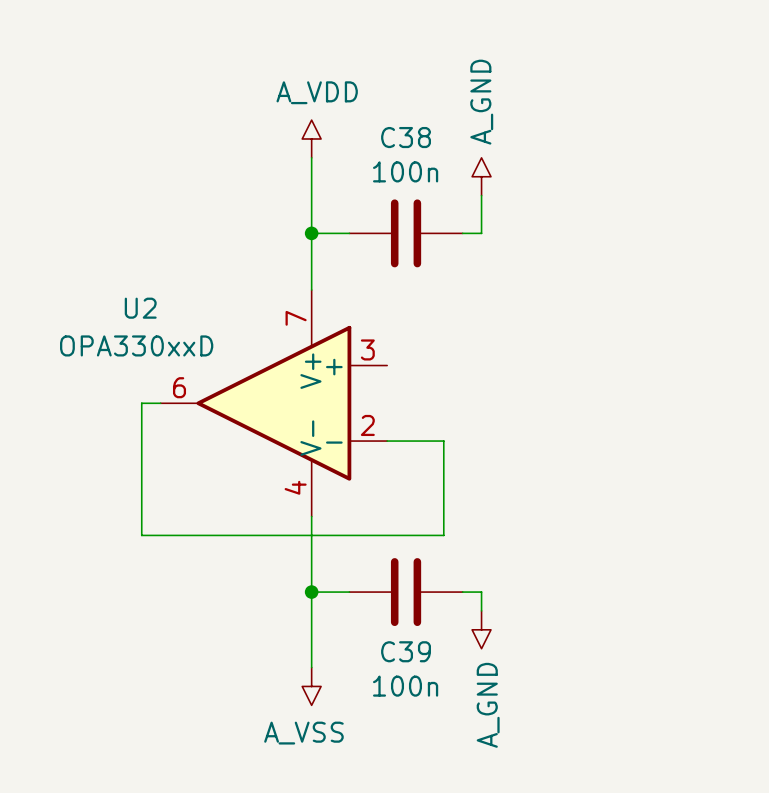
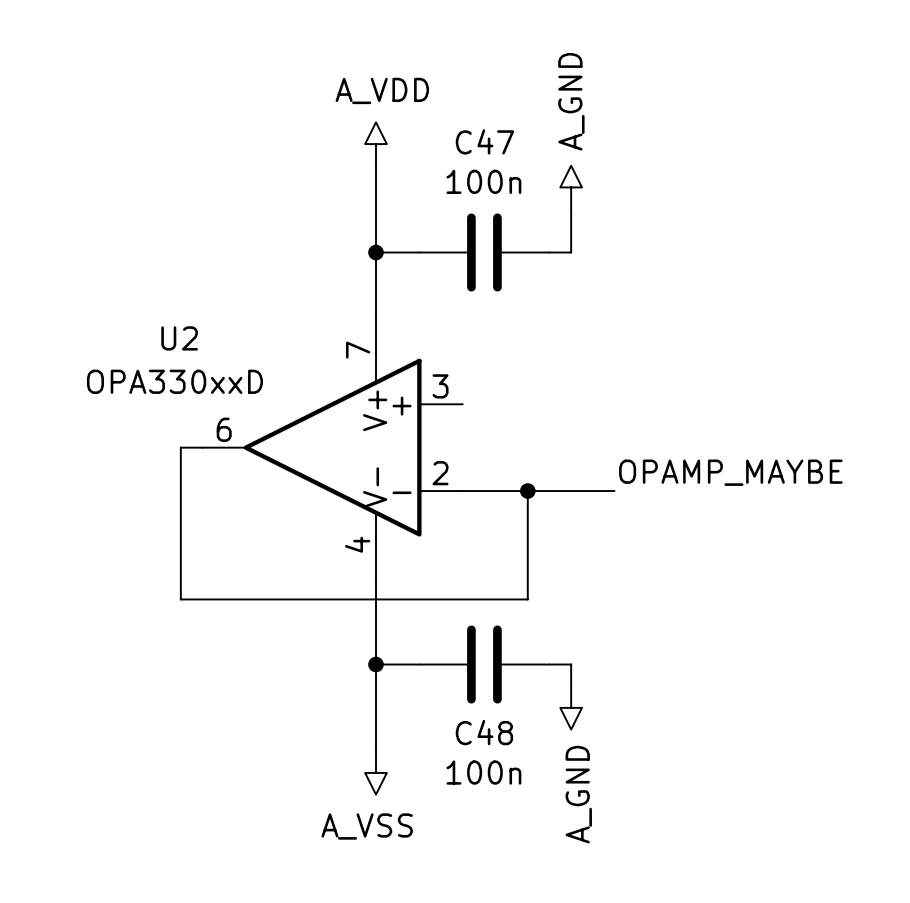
C38 name: C38 (406, 137) -> C47 (484, 141)
label: none -> OPAMP_MAYBE (730, 472)
wire: none -> (527, 491) (614, 491)
junction: none -> (527, 491)
C39 name: C39 (406, 651) -> C48 (484, 732)

